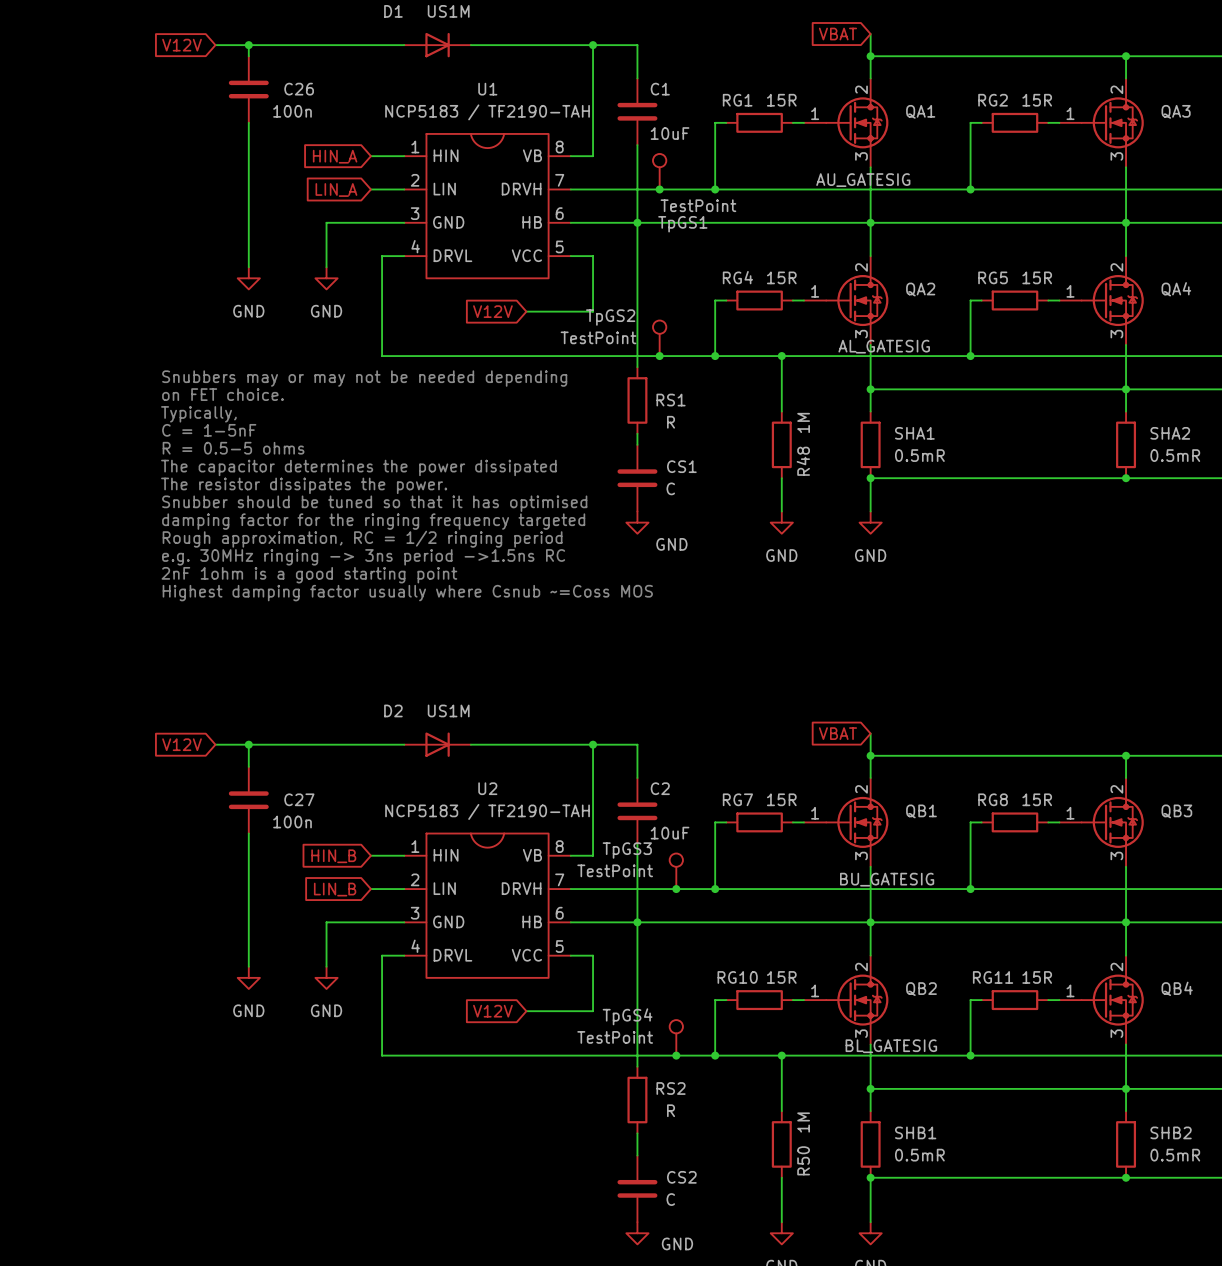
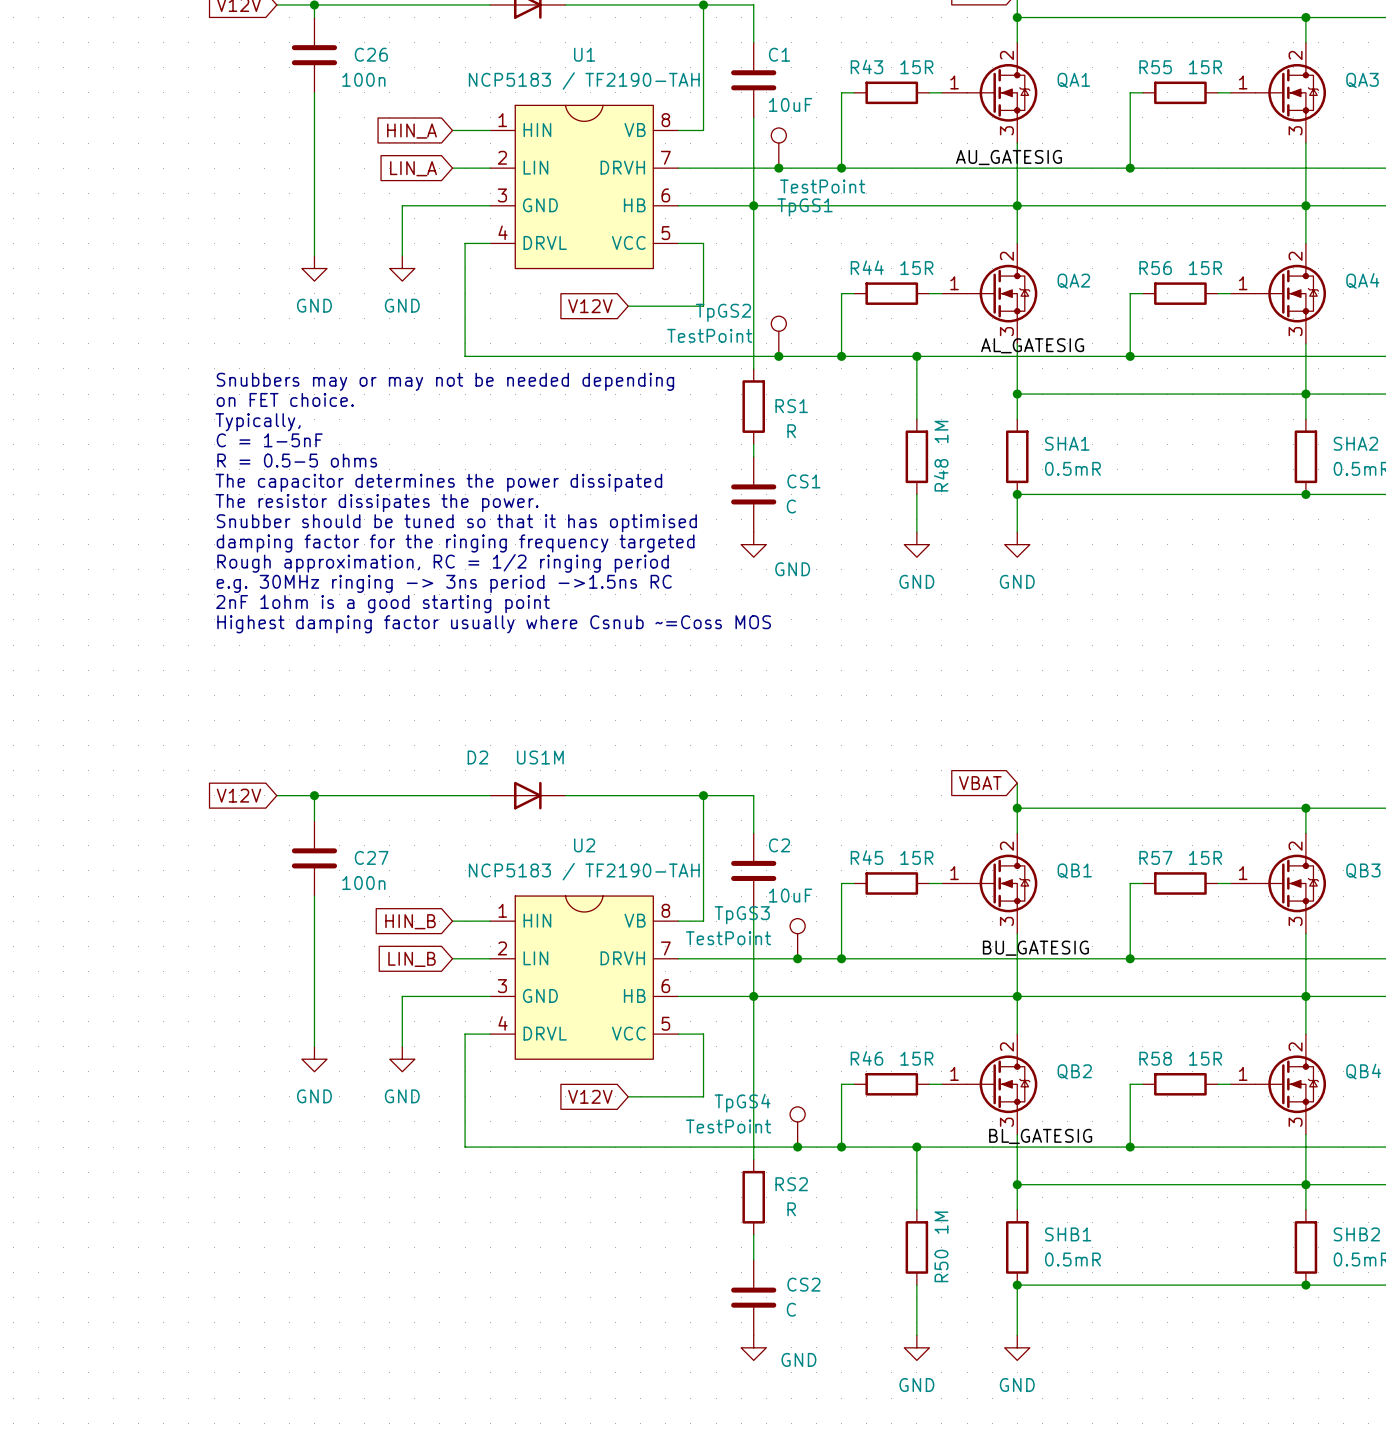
RG1 name: RG1 (737, 100) -> R43 (866, 66)
RG2 name: RG2 (993, 100) -> R55 (1155, 67)
RG4 name: RG4 (737, 277) -> R44 (867, 267)
RG5 name: RG5 (993, 277) -> R56 (1155, 268)
RG7 name: RG7 (737, 799) -> R45 (866, 857)
RG8 name: RG8 (993, 799) -> R57 (1155, 857)
RG10 name: RG10 (737, 977) -> R46 (866, 1058)
RG11 name: RG11 (993, 977) -> R58 (1155, 1058)

